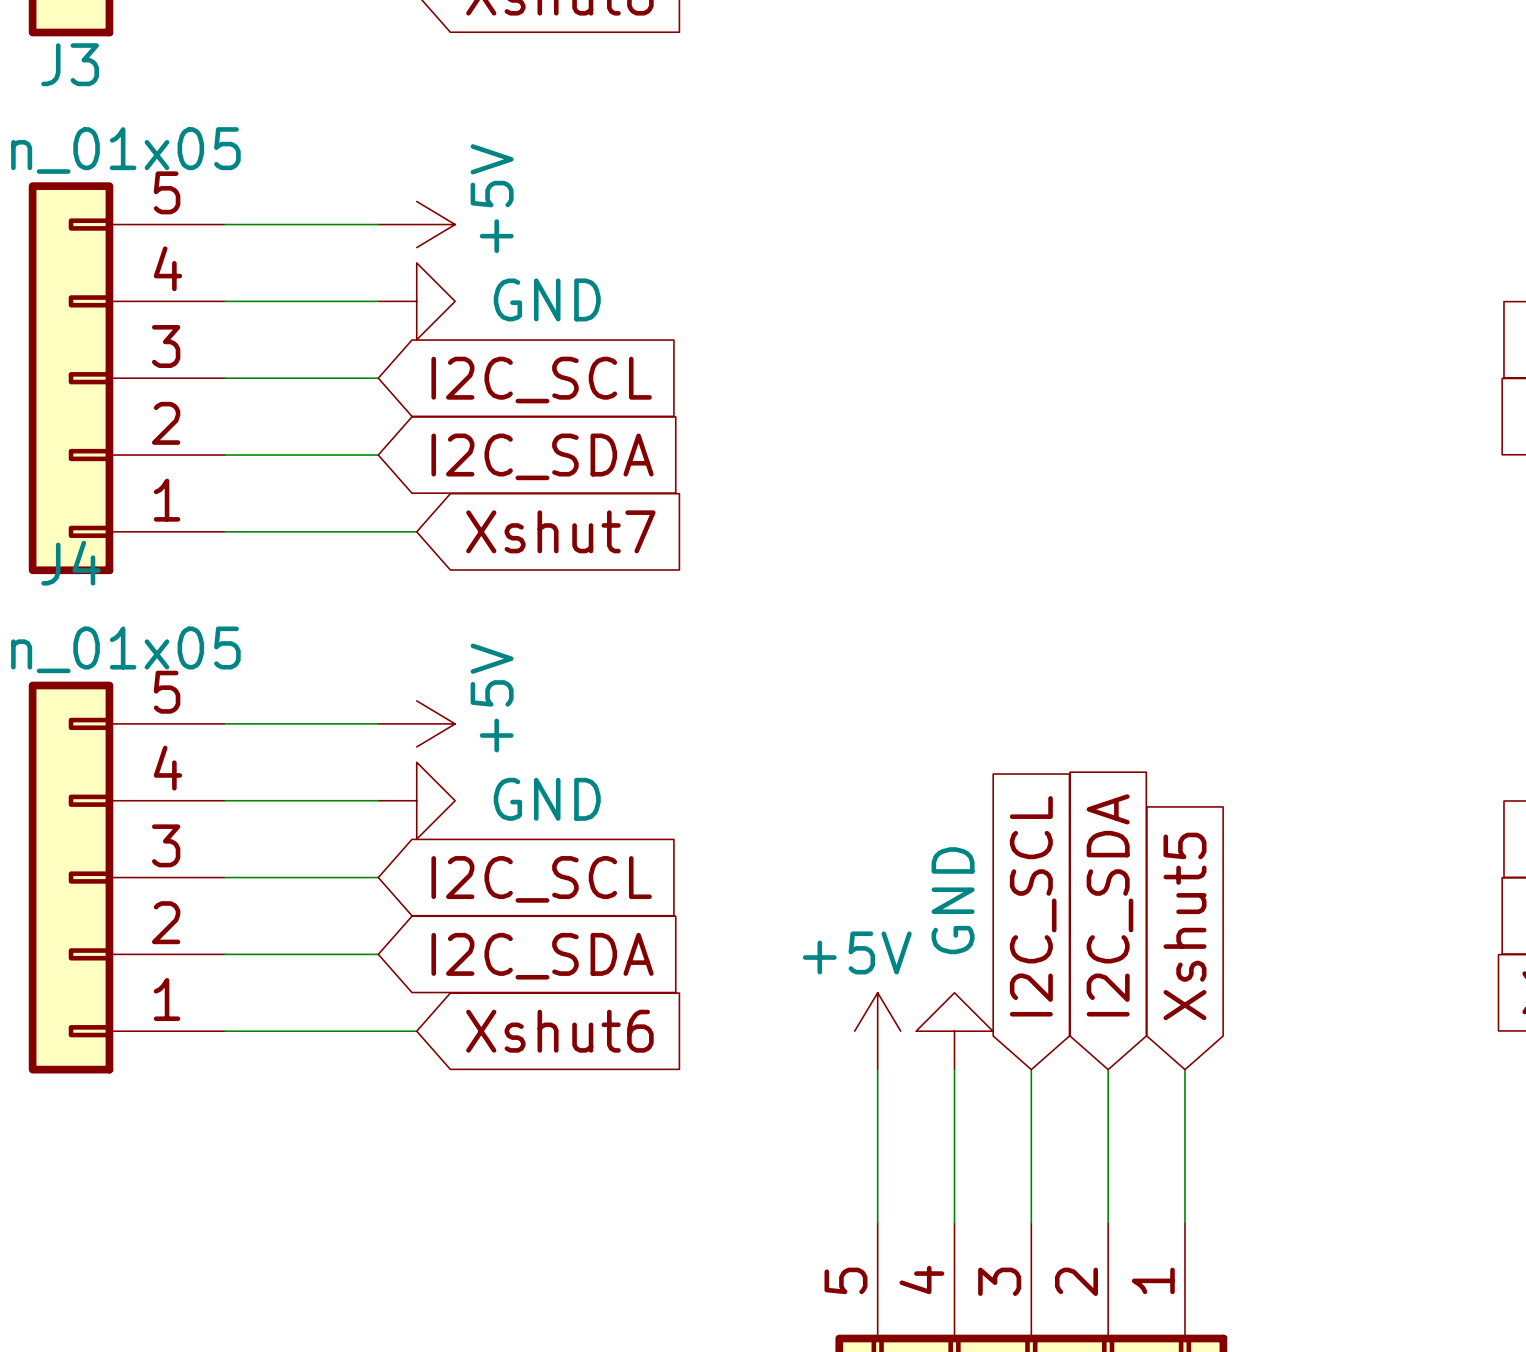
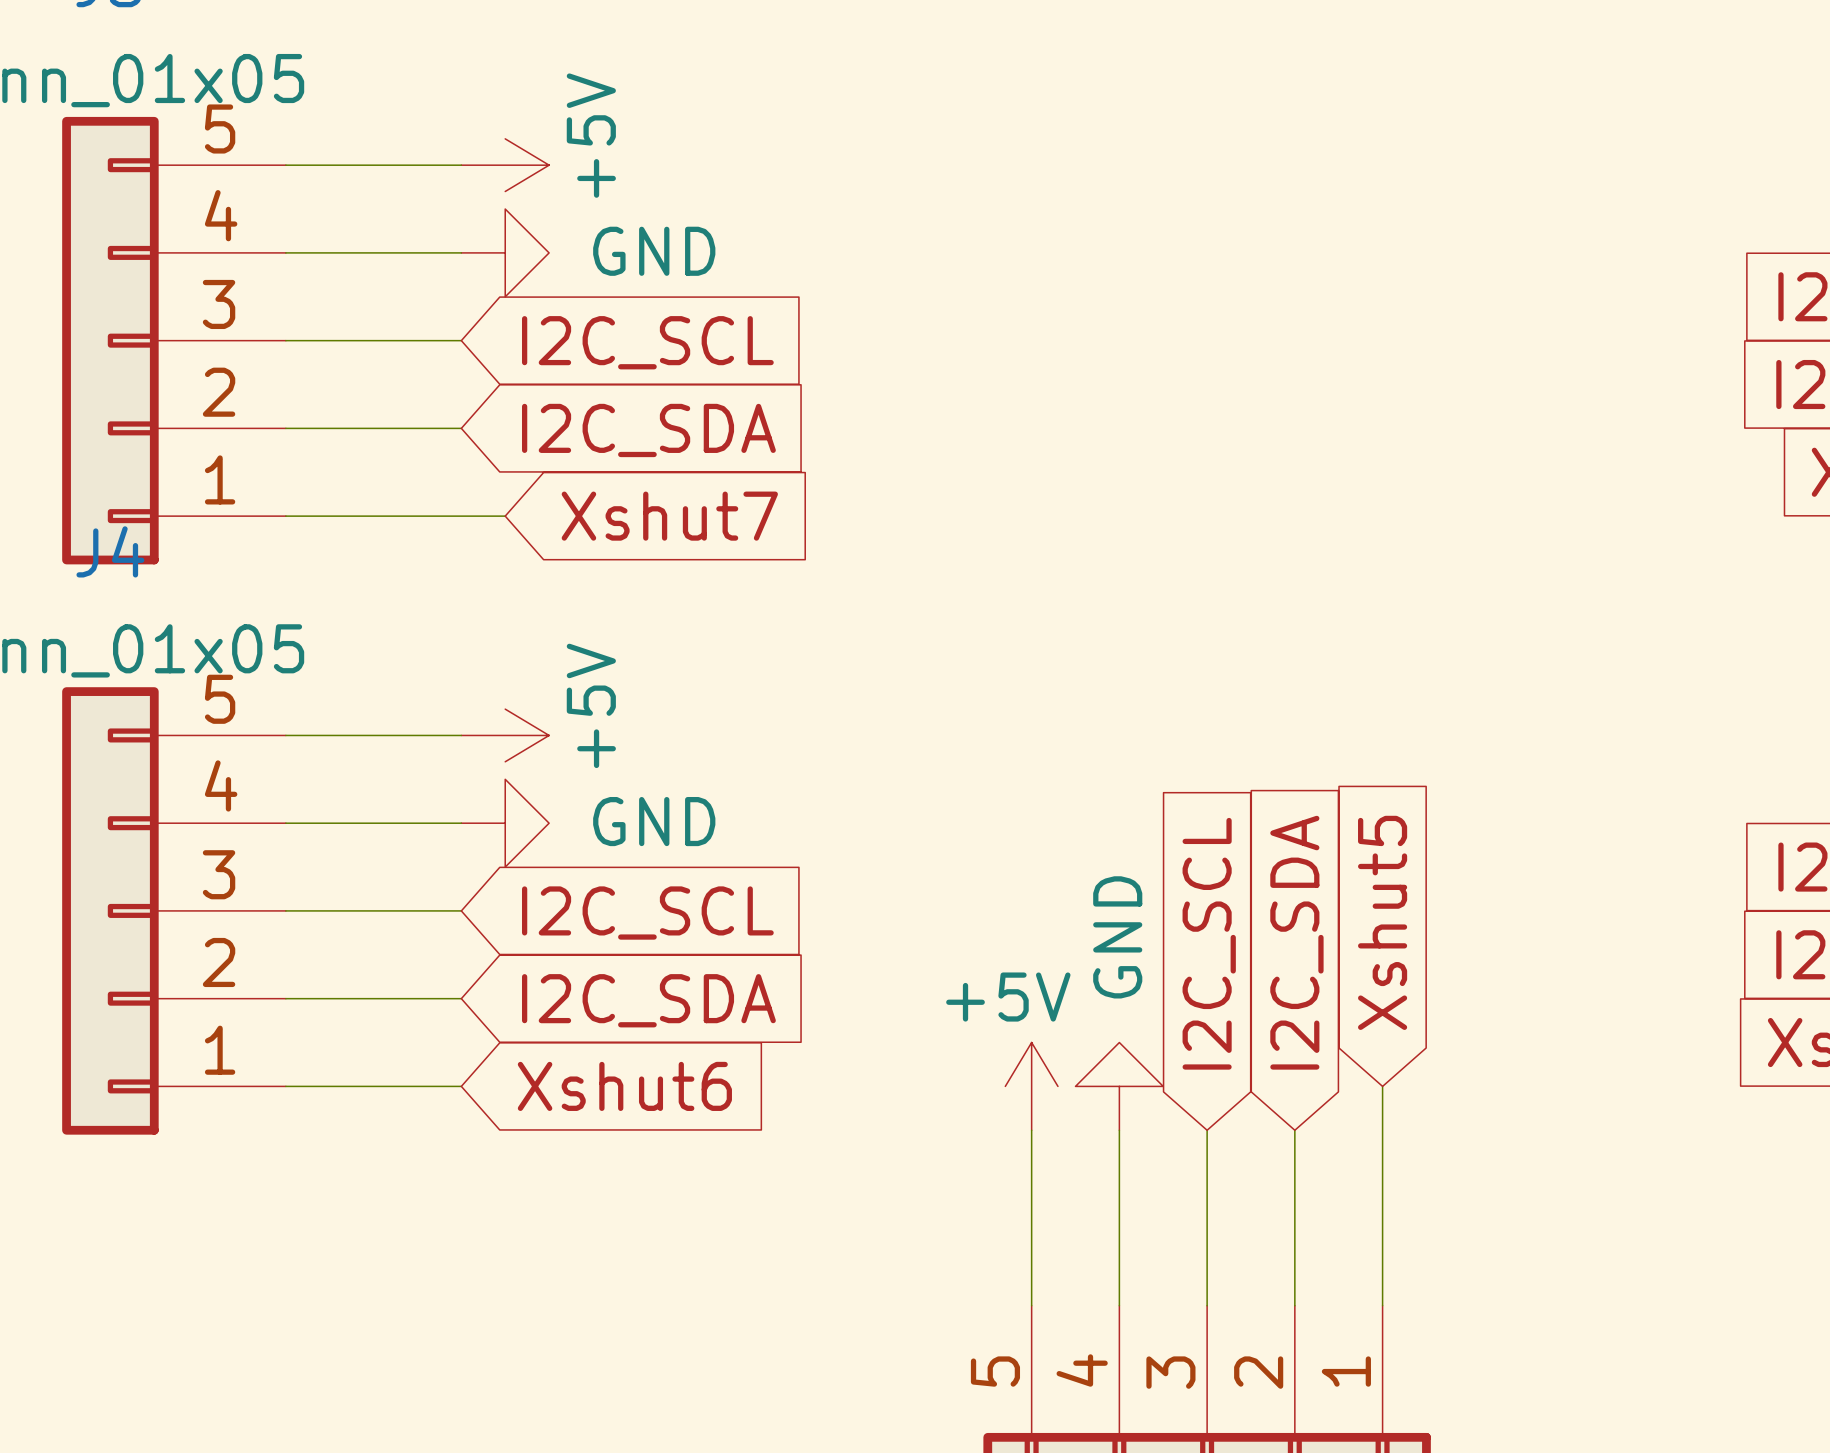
global label position: Xshut5 (1184, 926) -> Xshut5 (1382, 922)
wire: (378, 1031) (416, 1031) -> none
global label position: Xshut6 (559, 1031) -> Xshut6 (624, 1086)
wire: none -> (1382, 1086) (1382, 1130)

